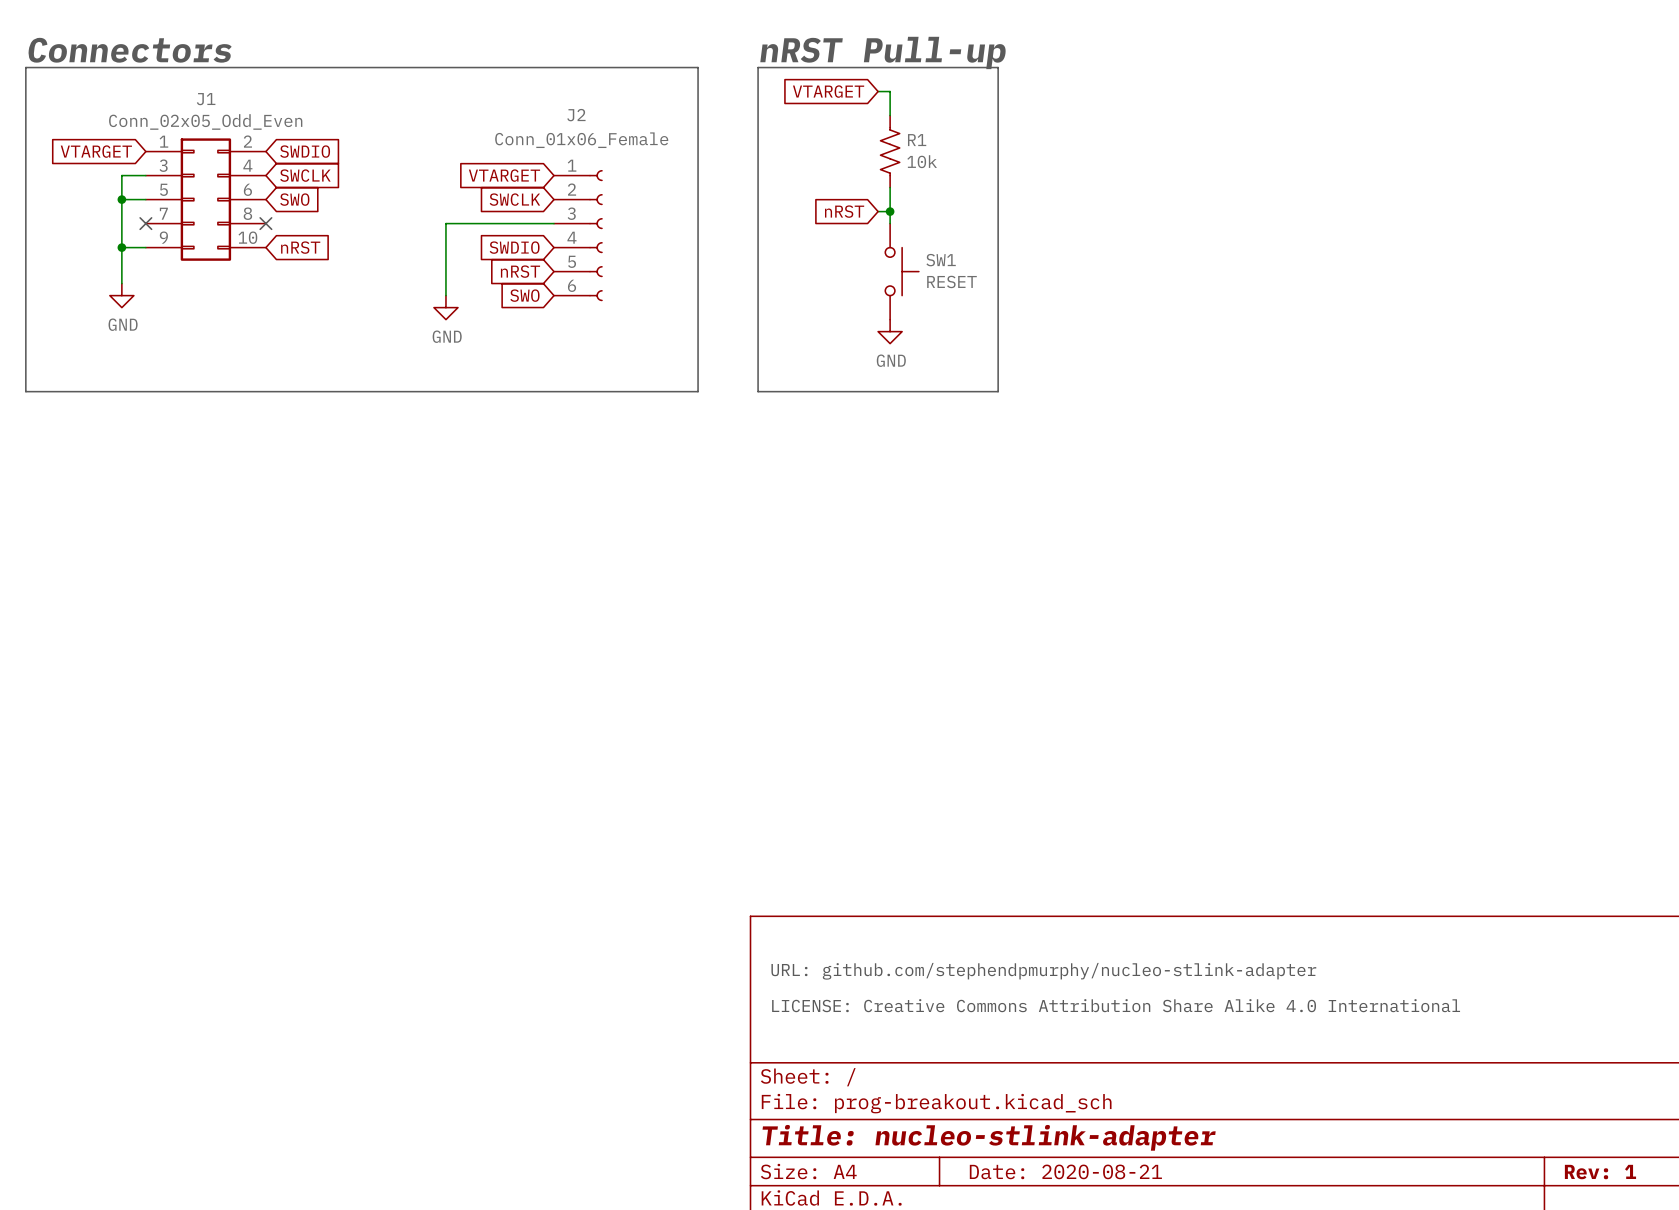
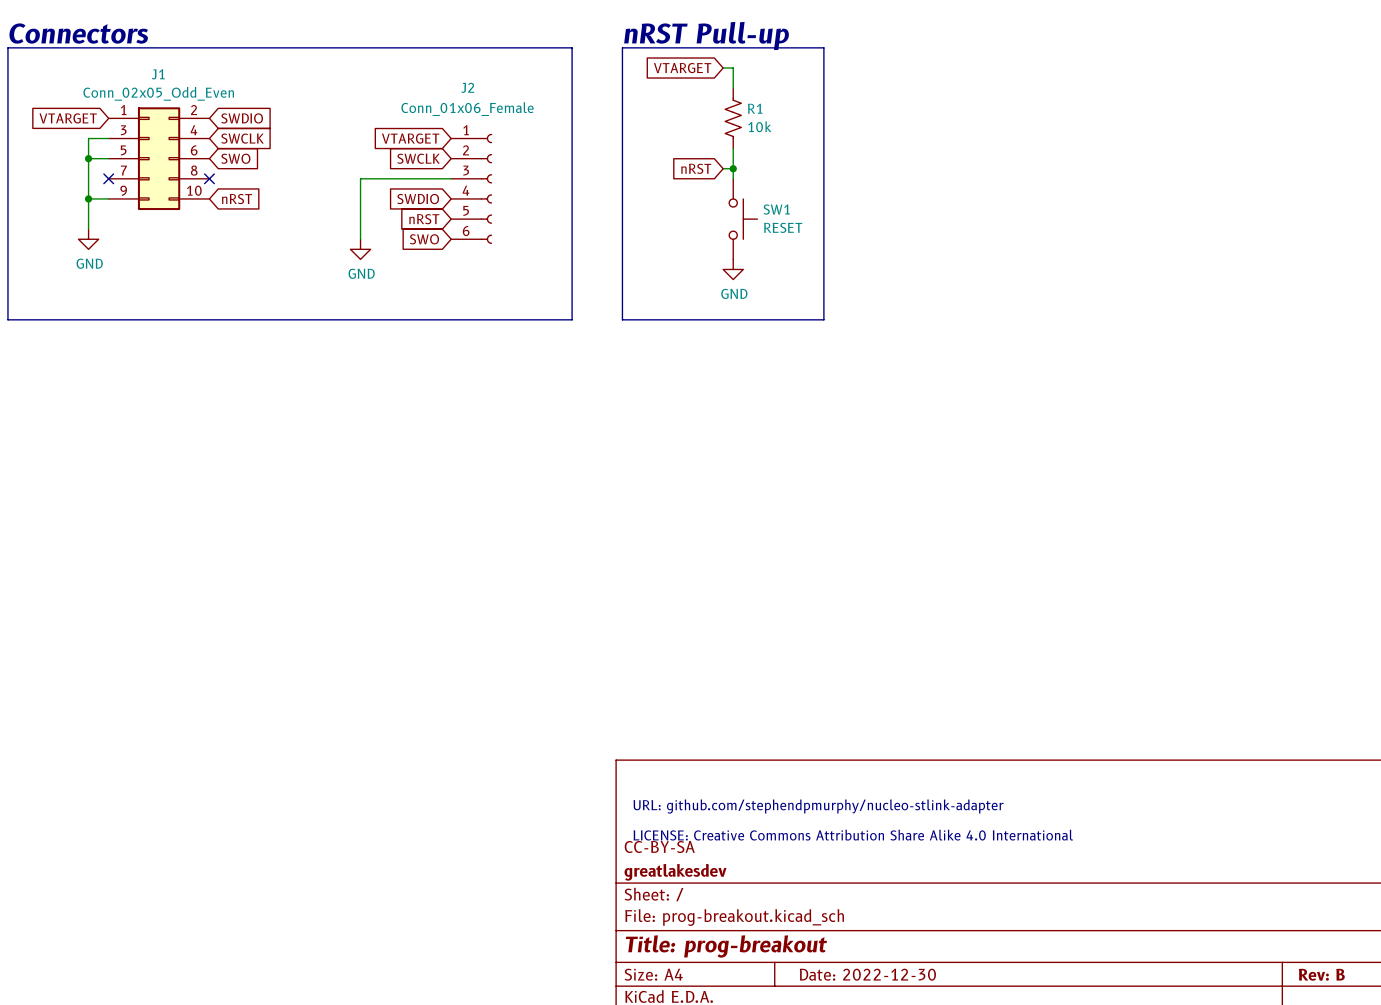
title block: none -> CC-BY-SA (659, 846)
title block: none -> greatlakesdev (675, 872)
title block: Title: nucleo-stlink-adapter (989, 1137) -> Title: prog-breakout (726, 946)
title block: Date: 2020-08-21 (1065, 1171) -> Date: 2022-12-30 (867, 974)
title block: Rev: 1 (1600, 1172) -> Rev: B (1321, 974)

